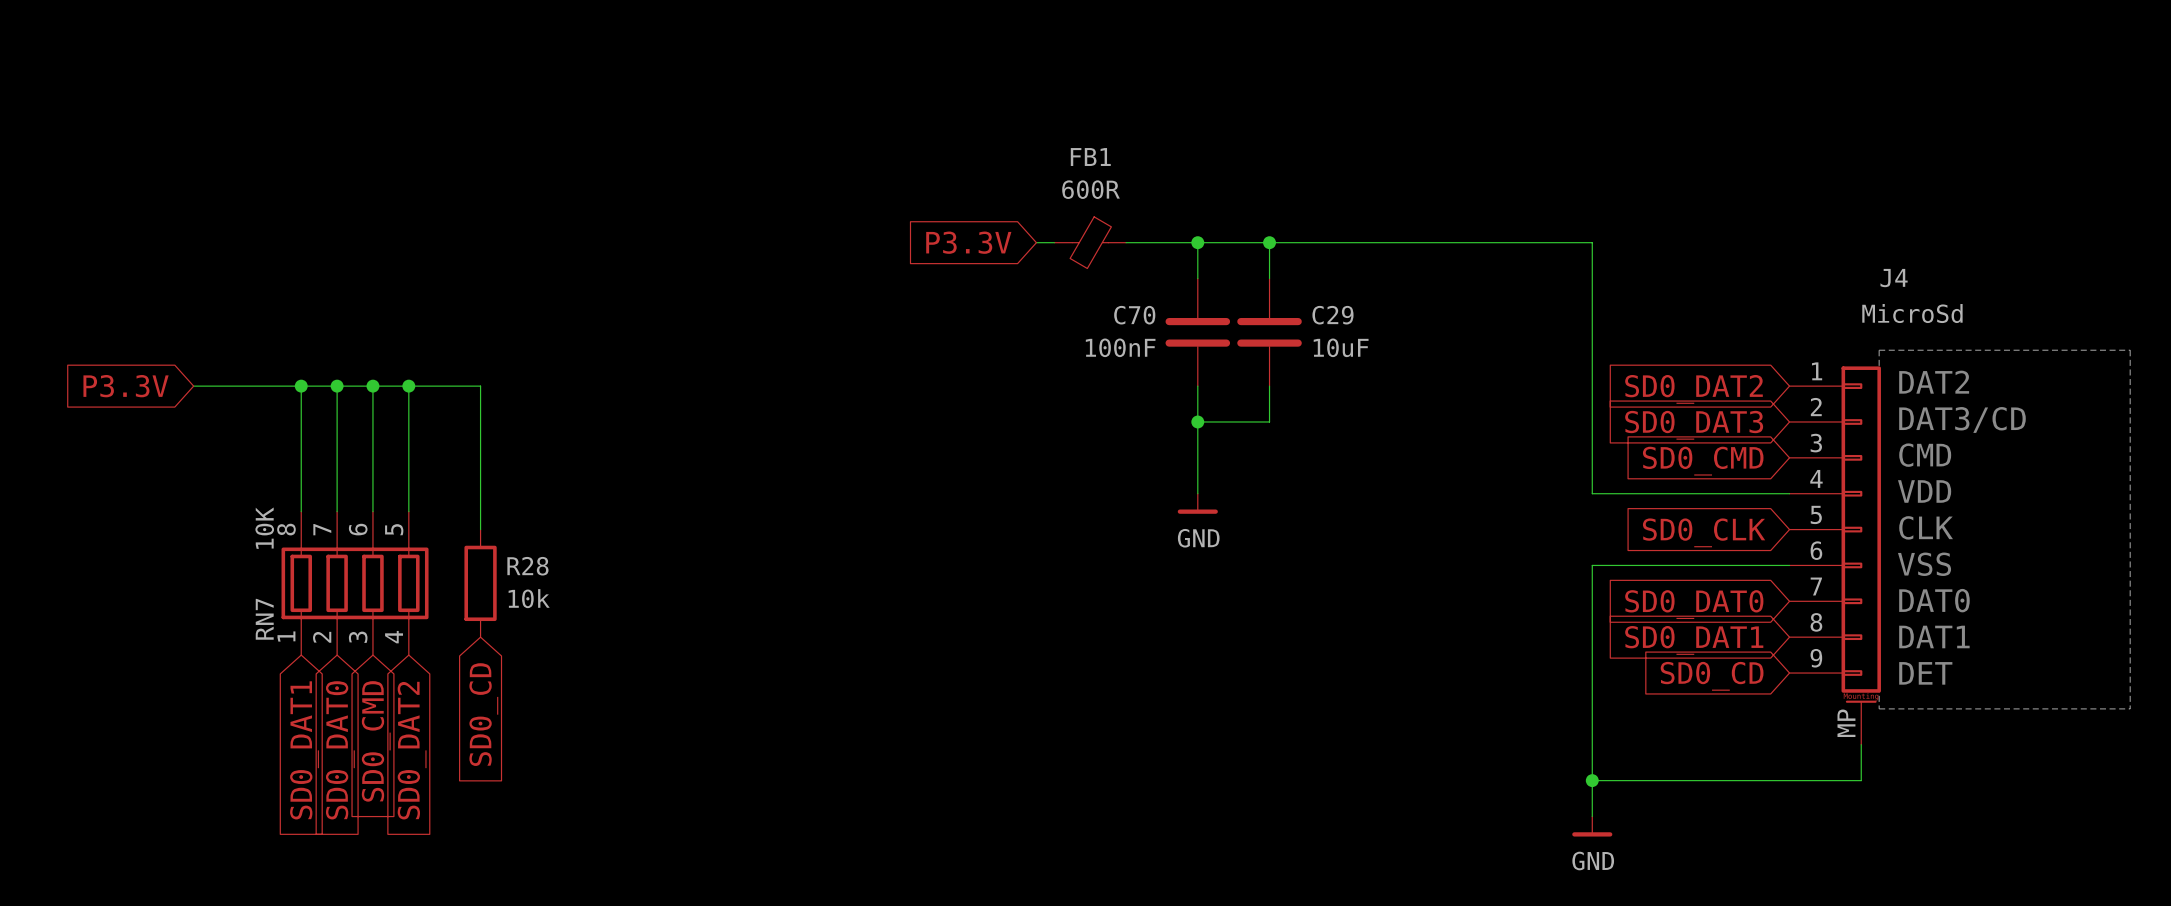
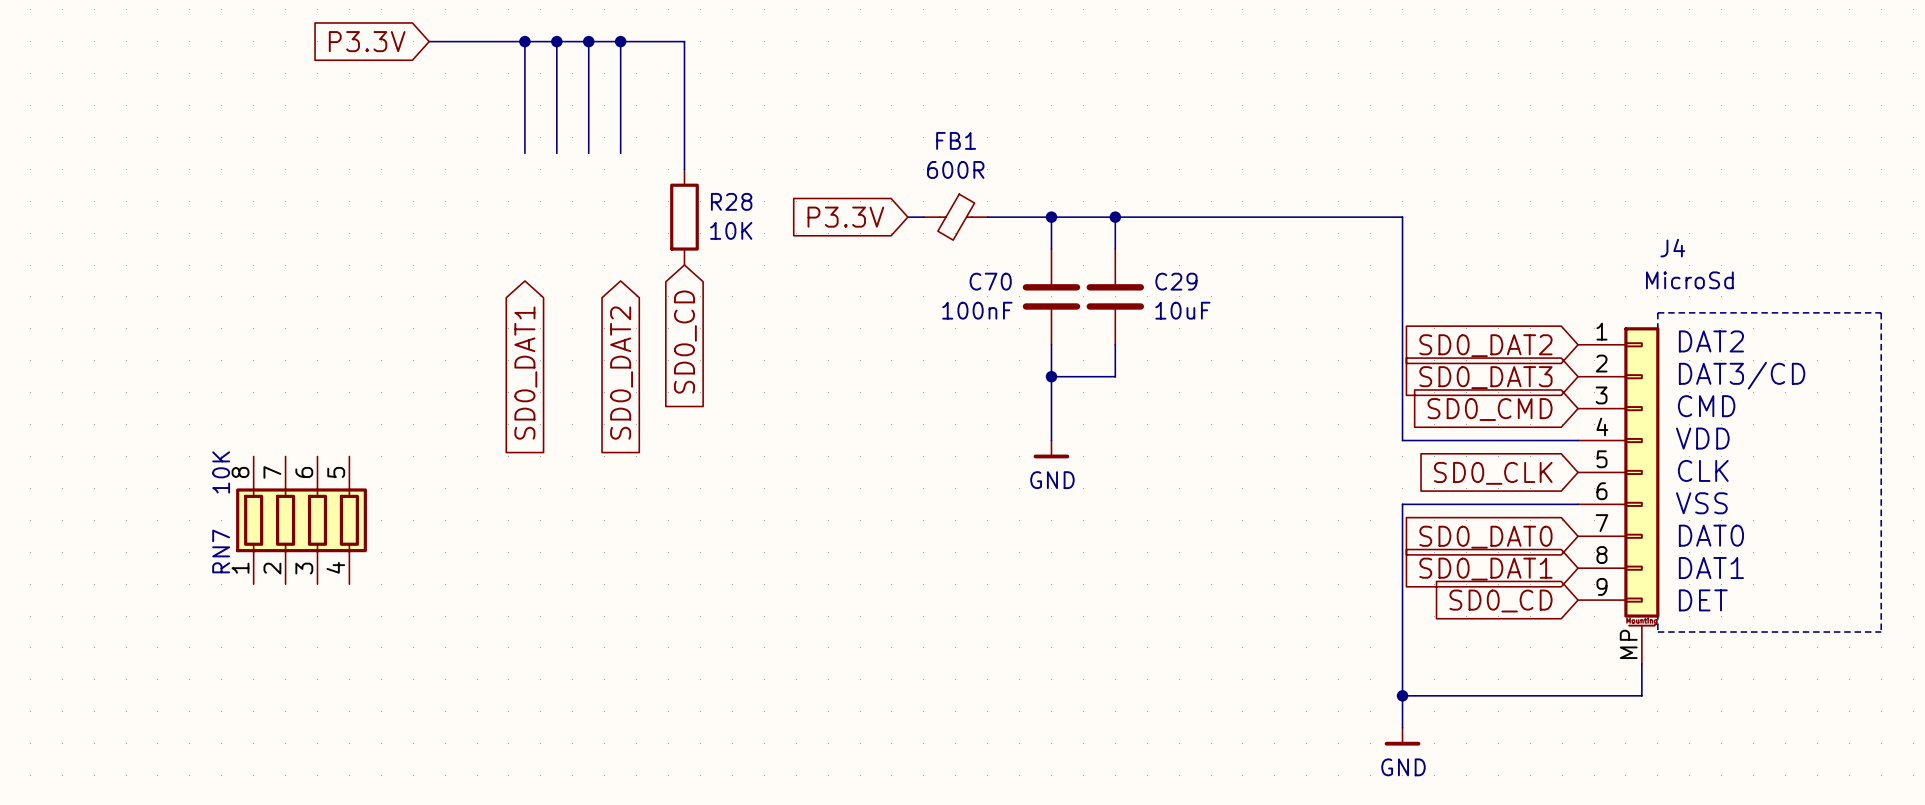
global label: none -> P3.3V (367, 41)
wire: none -> (429, 41) (684, 41) (684, 169)
wire: none -> (524, 41) (524, 153)
junction: none -> (524, 41)
wire: none -> (556, 41) (556, 153)
junction: none -> (556, 41)
wire: none -> (588, 41) (588, 153)
junction: none -> (588, 41)
wire: none -> (620, 41) (620, 153)
junction: none -> (620, 41)
global label: none -> SD0_CD (685, 342)
global label: P3.3V (126, 386) -> none
wire: (193, 386) (480, 386) (480, 529) -> none
wire: (301, 386) (301, 511) -> none
junction: (301, 386) -> none
wire: (337, 386) (337, 511) -> none
junction: (337, 386) -> none
wire: (372, 386) (372, 511) -> none
junction: (372, 386) -> none
wire: (408, 386) (408, 511) -> none
junction: (408, 386) -> none
global label: none -> SD0_DAT1 (525, 373)
global label: none -> SD0_DAT2 (621, 373)
R28 position: (480, 583) -> (684, 217)
R28 value: 10k (529, 598) -> 10K (731, 230)
global label: SD0_CD (483, 714) -> none
global label: SD0_CMD (376, 741) -> none
global label: SD0_DAT1 (304, 750) -> none
global label: SD0_DAT0 (340, 750) -> none
global label: SD0_DAT2 (412, 750) -> none

